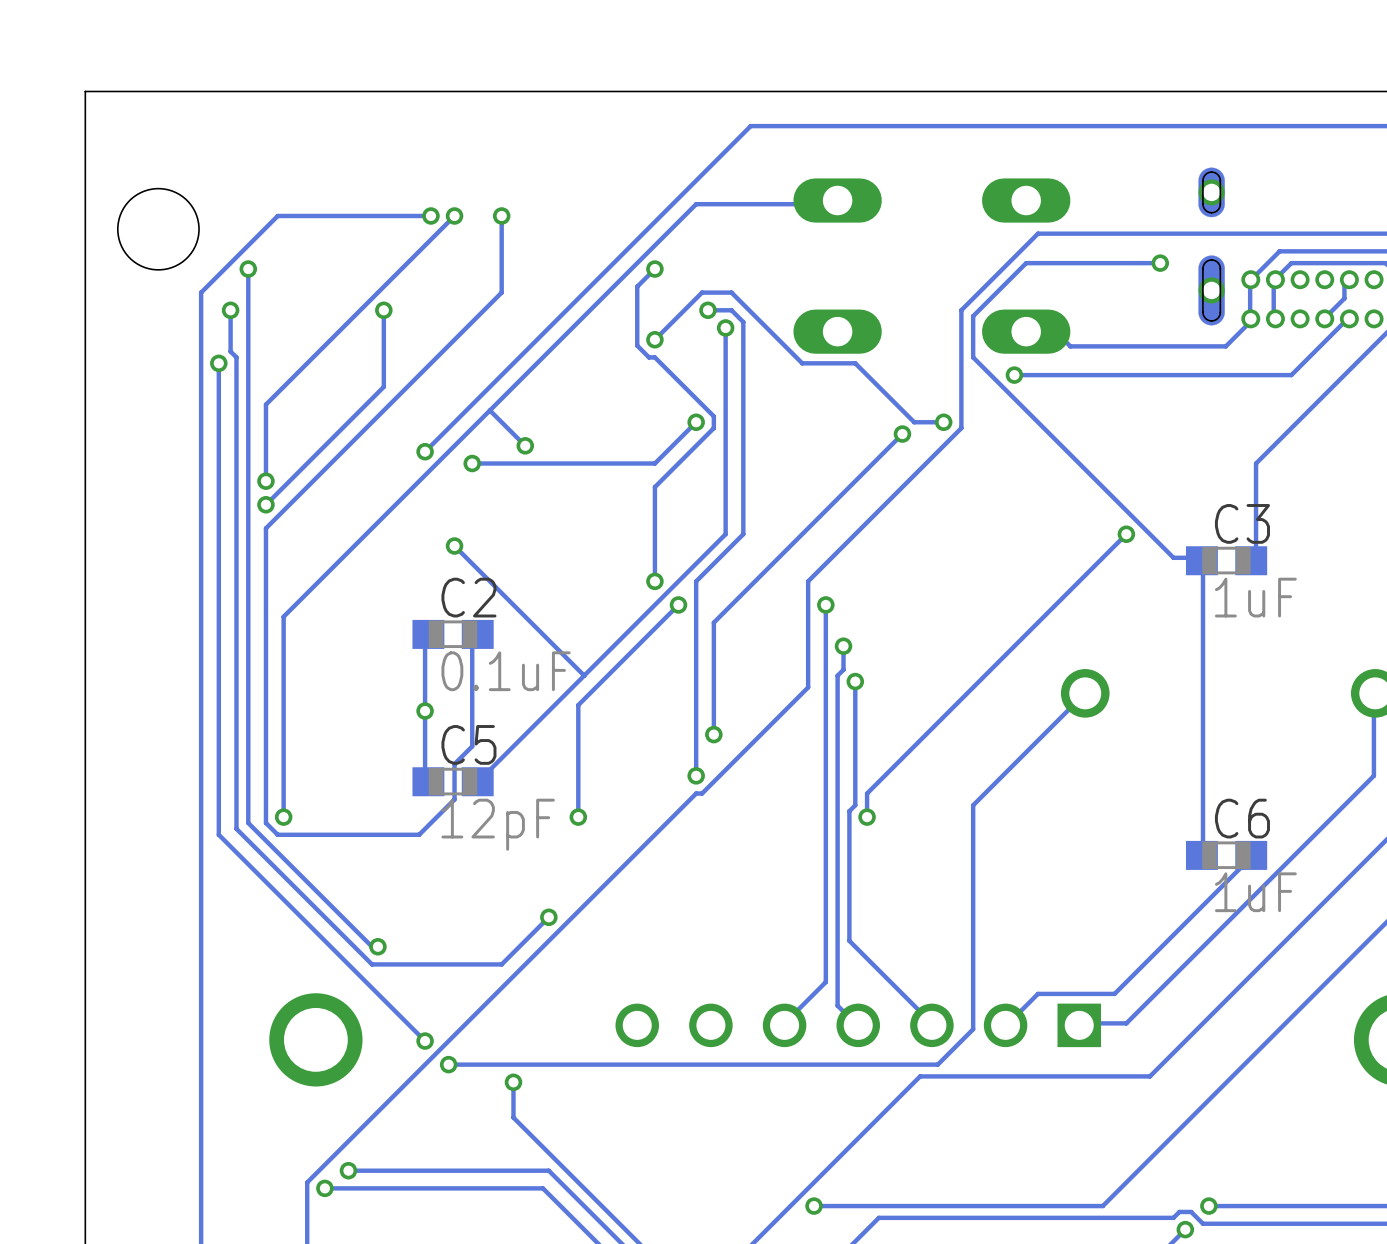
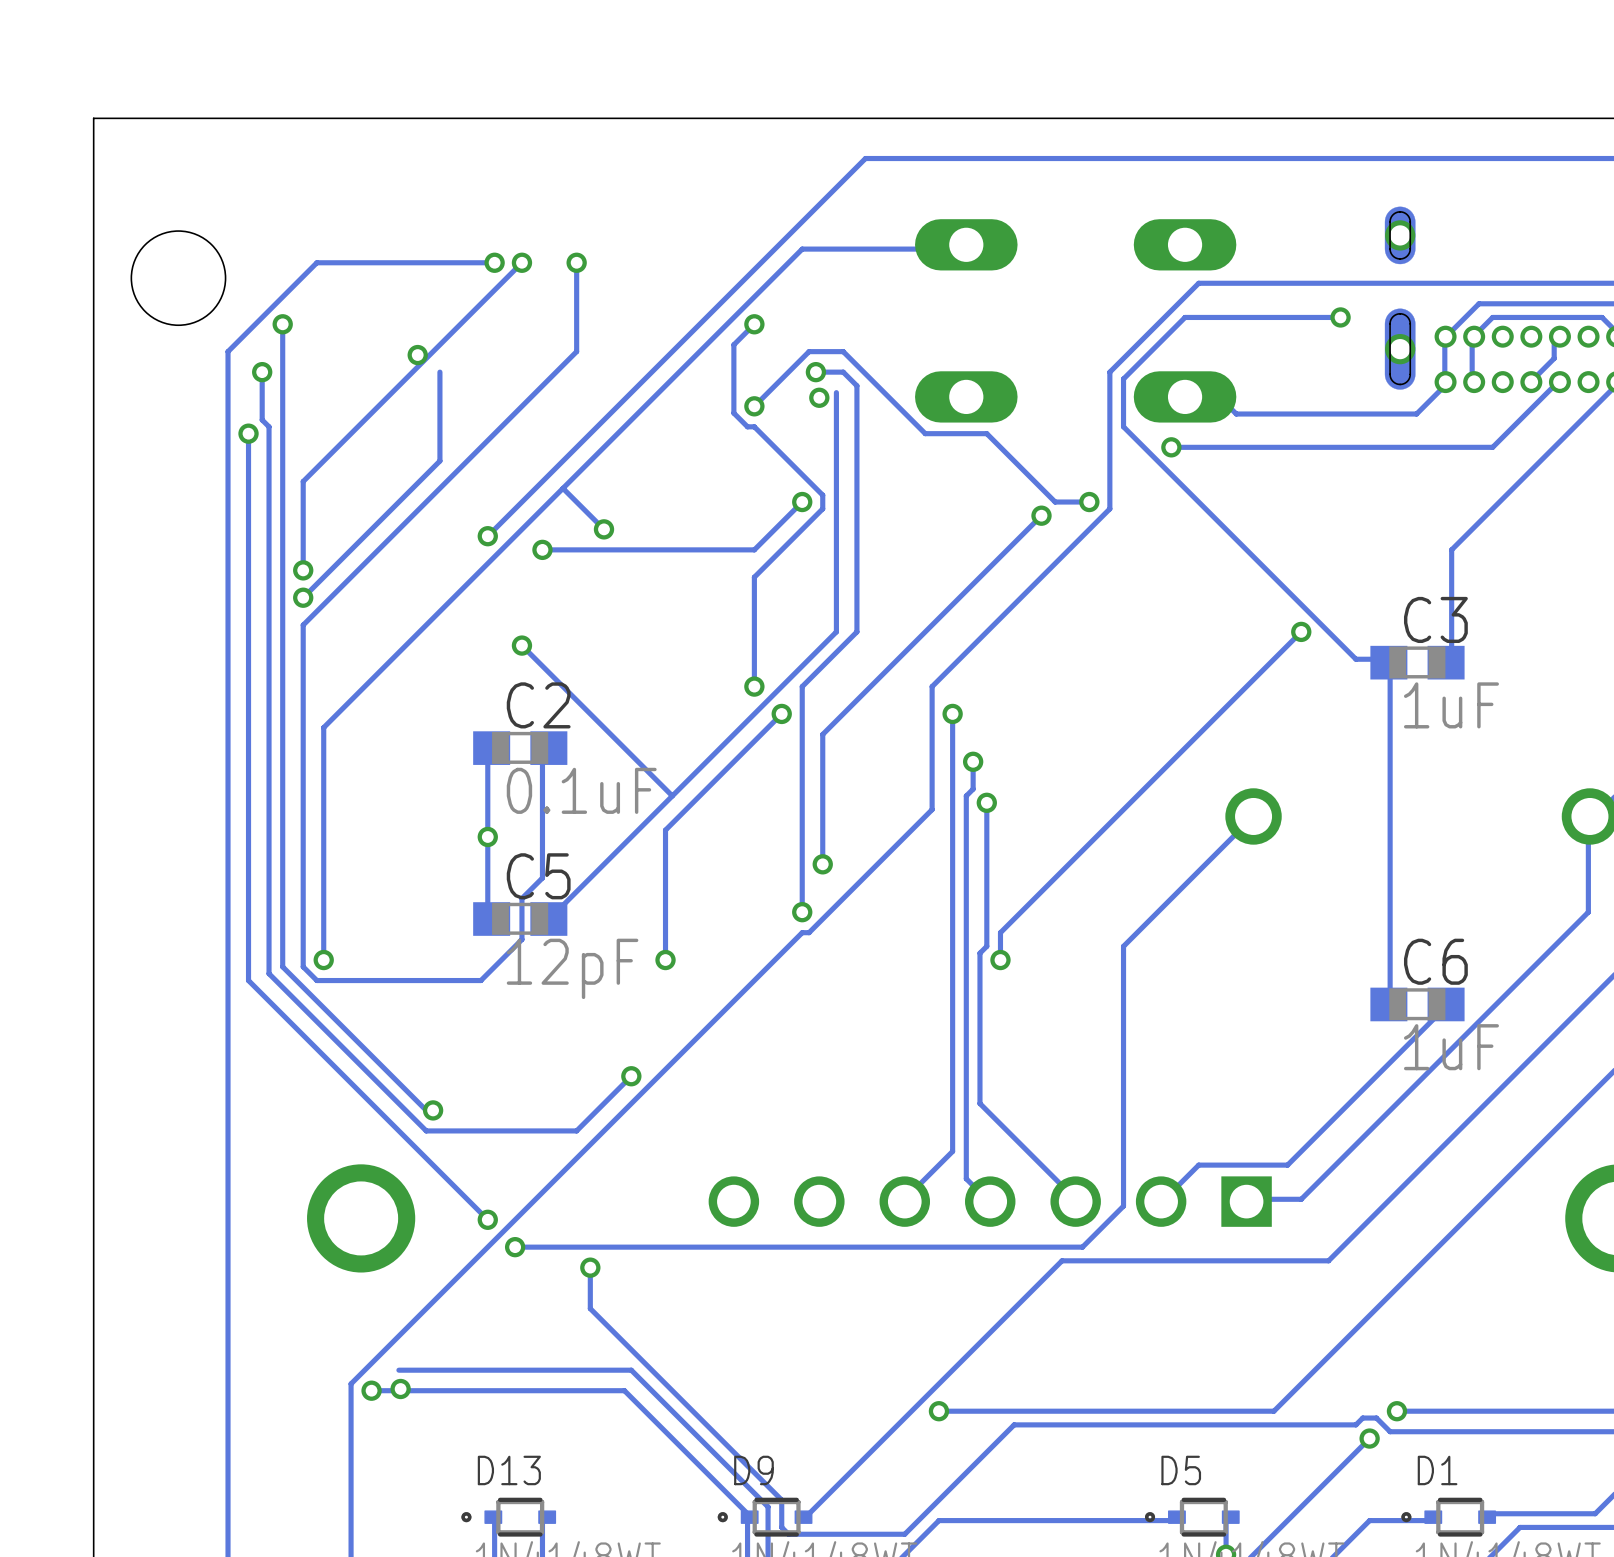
via position: (383, 310) -> (417, 355)
via position: (725, 327) -> (819, 397)
via position: (348, 1170) -> (400, 1388)

